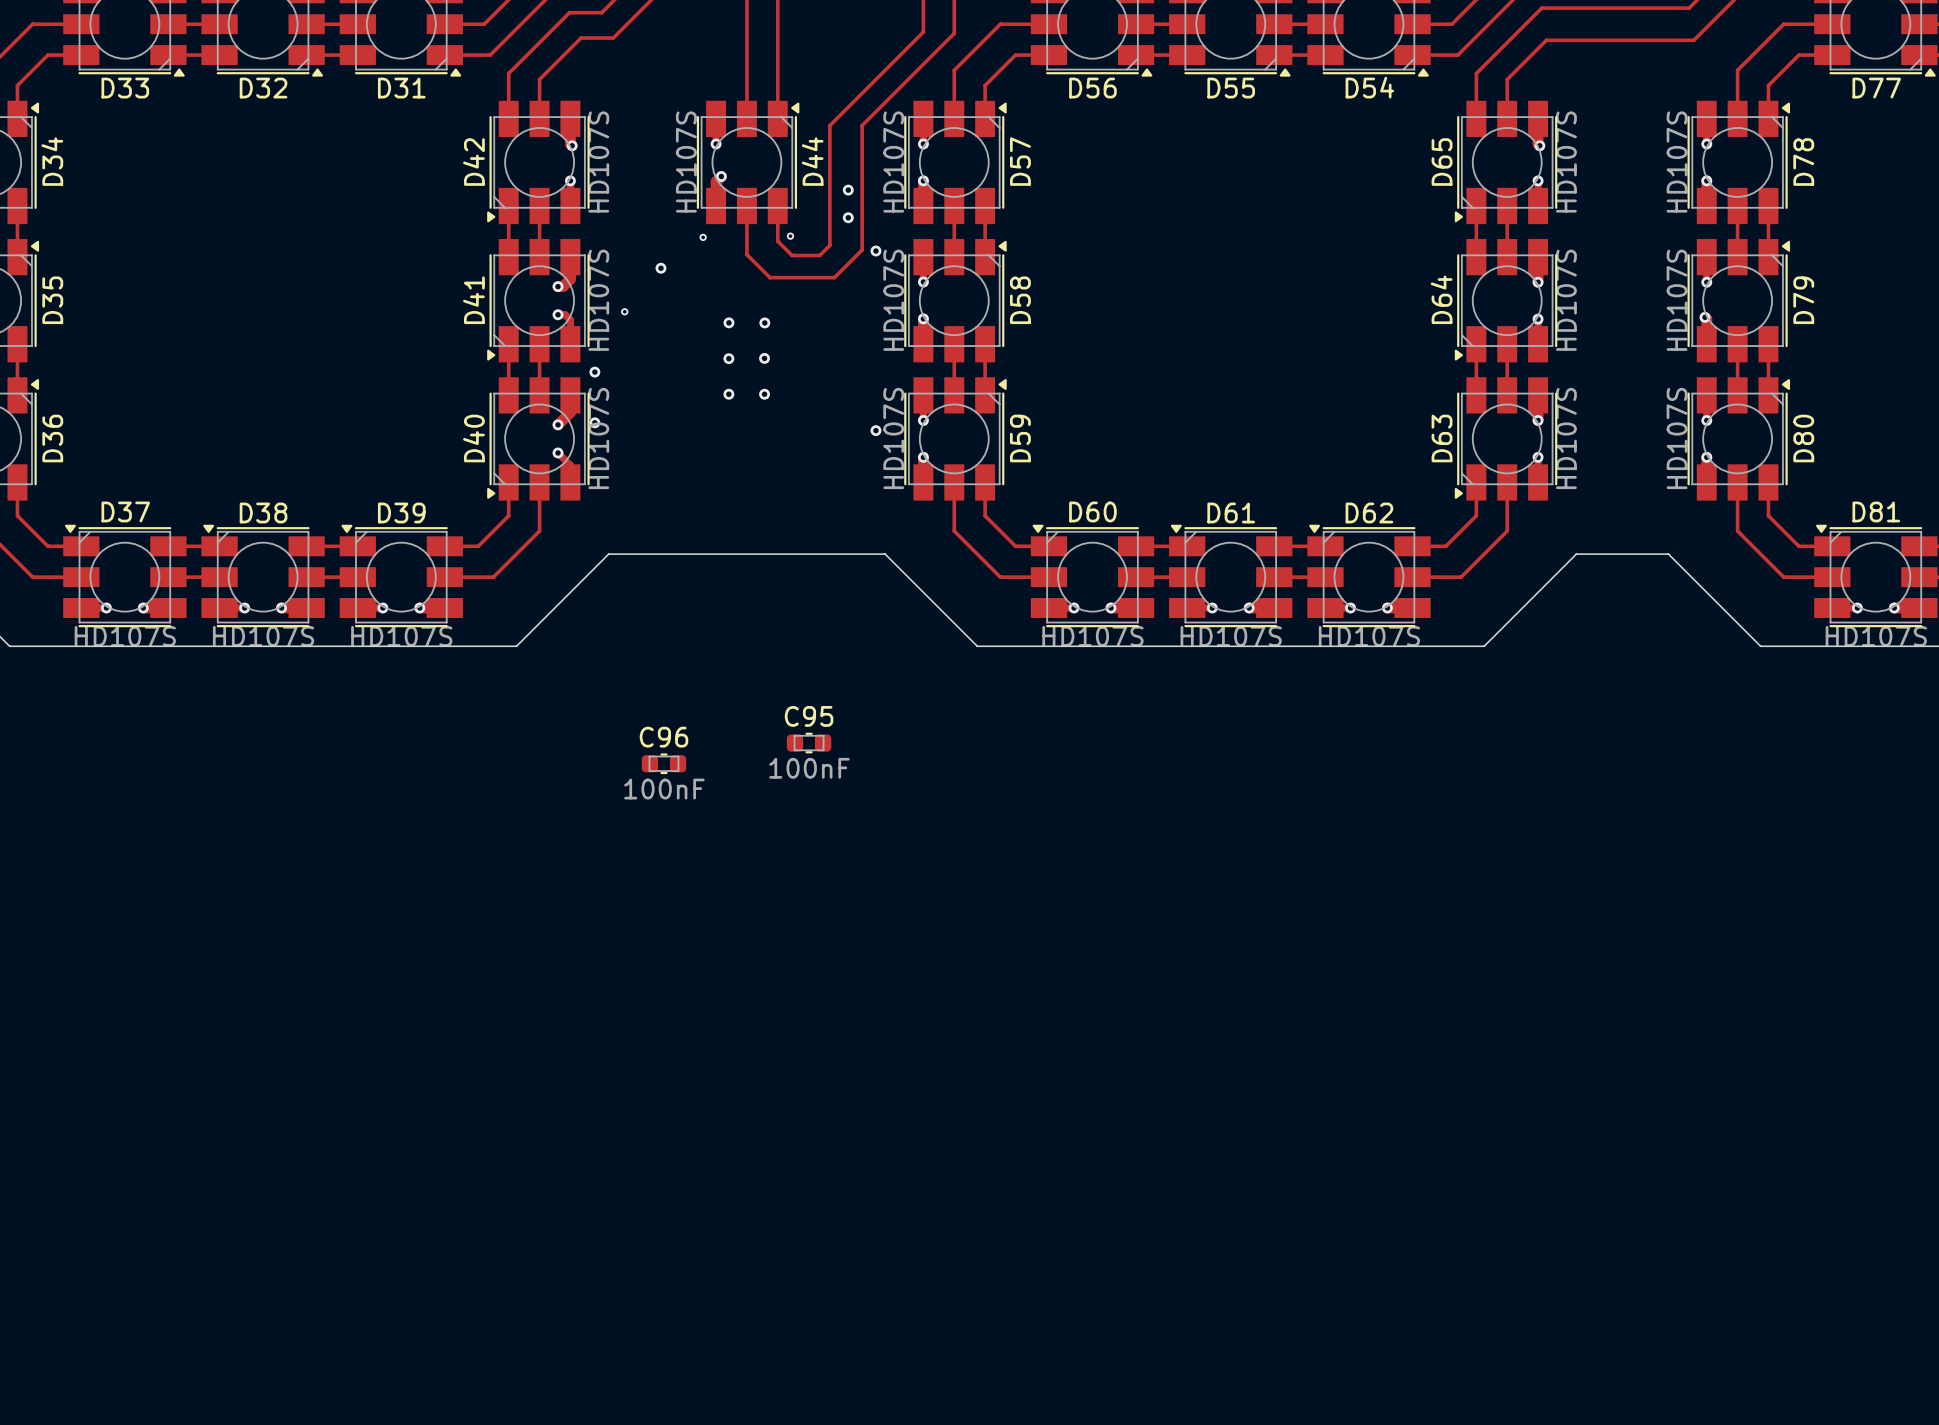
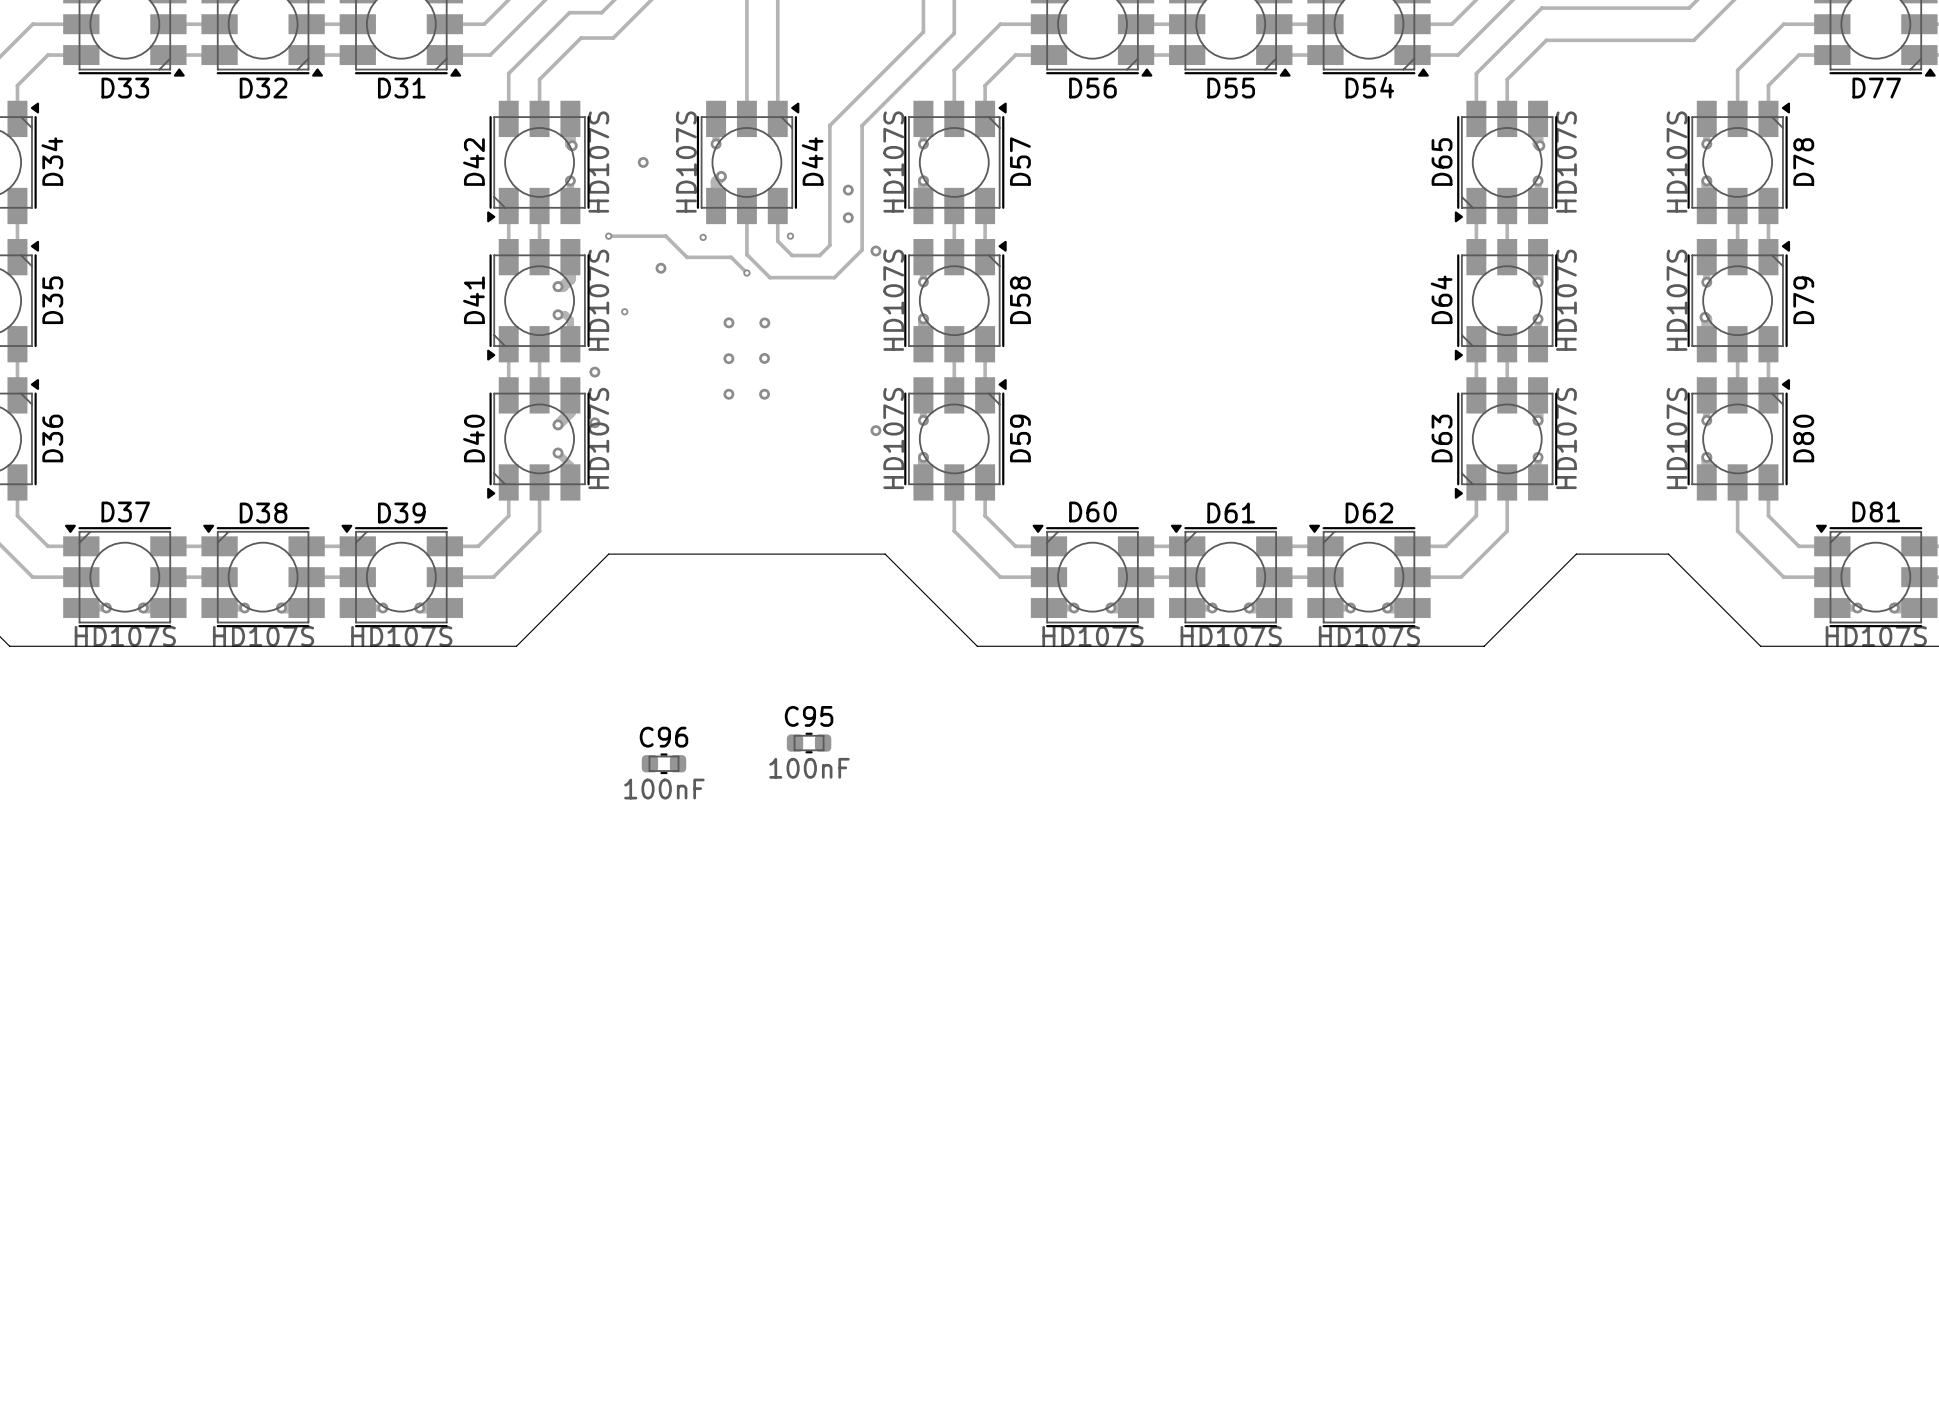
via: none -> (643, 162)
track: none -> (608, 236) (665, 236) (687, 257) (731, 257) (746, 273)
via: none -> (608, 236)
via: none -> (746, 273)

